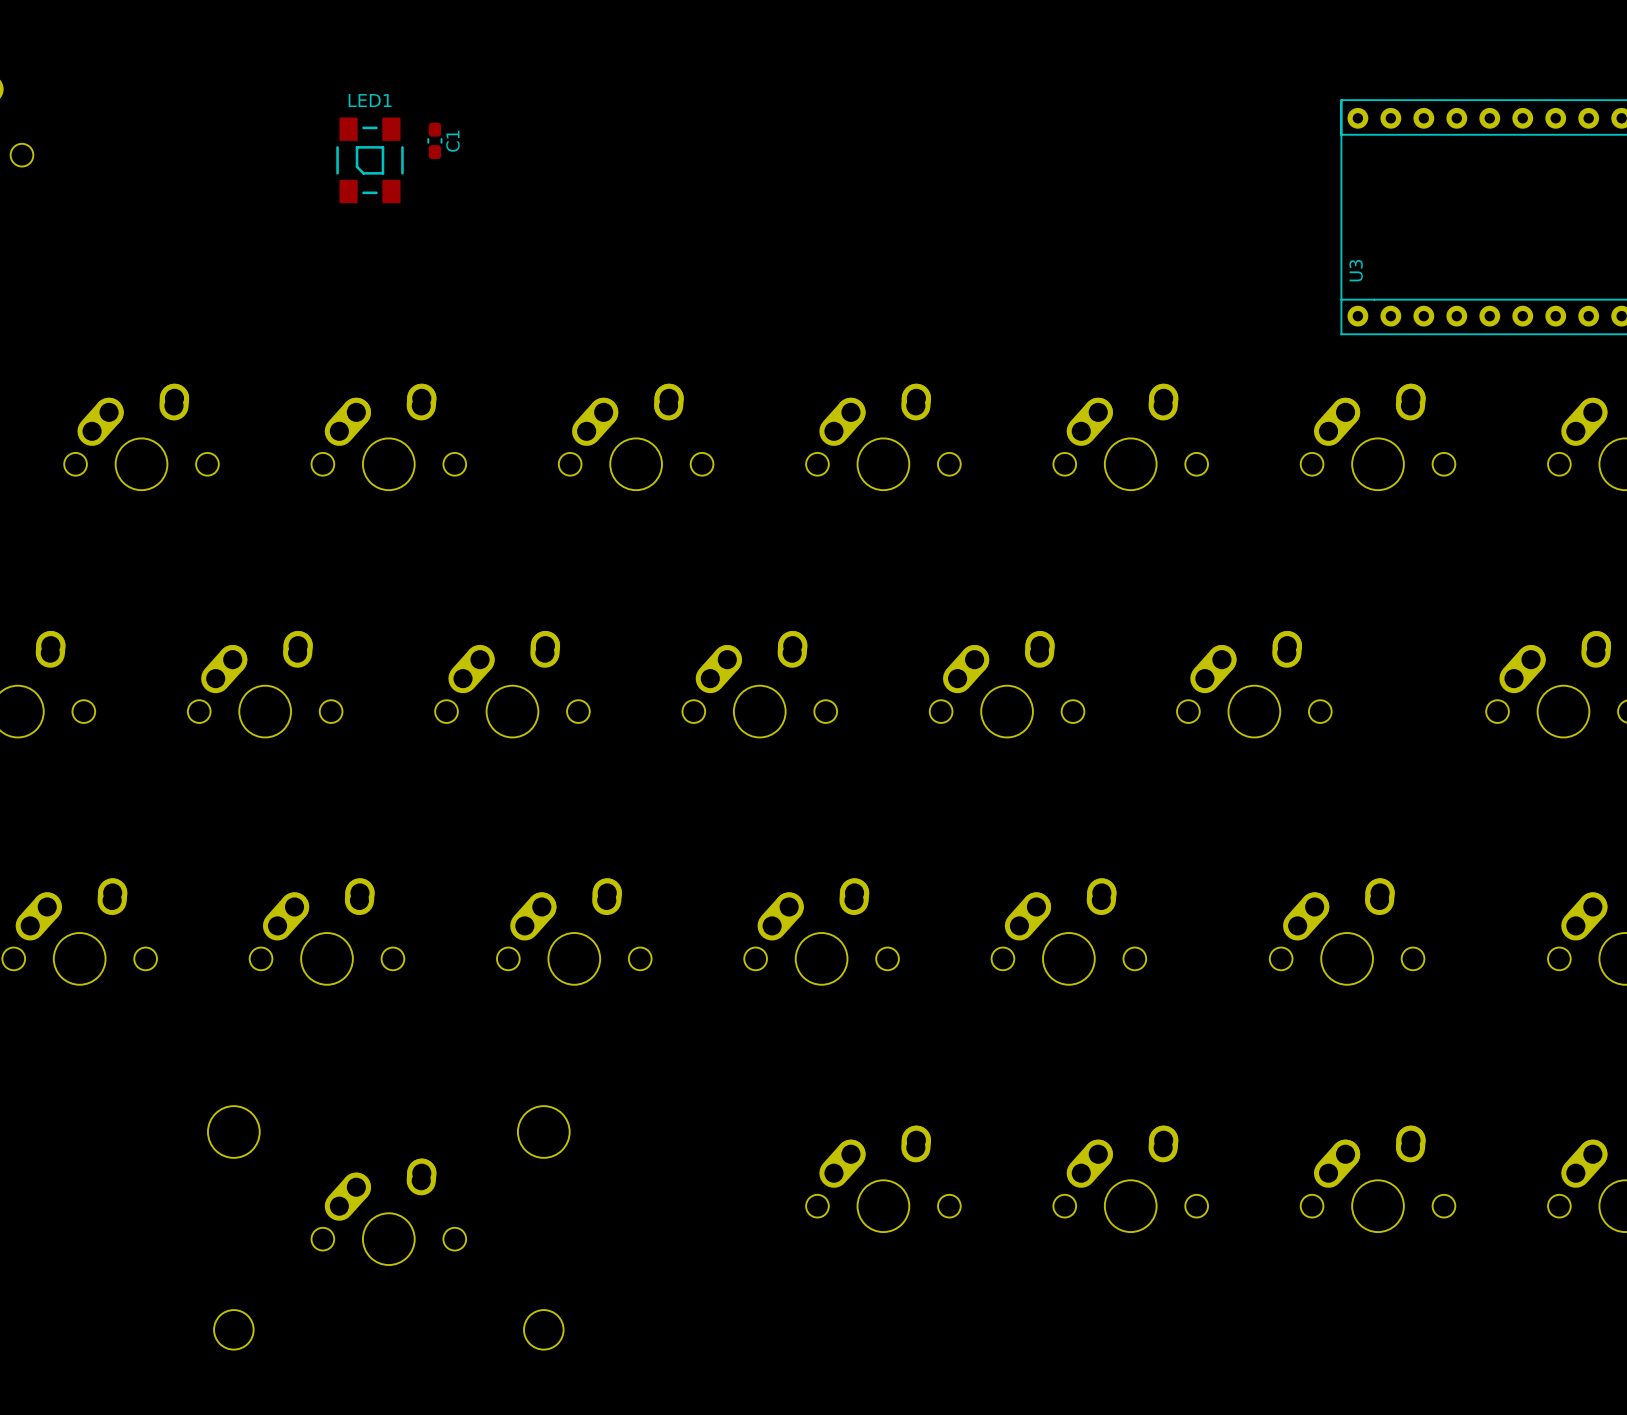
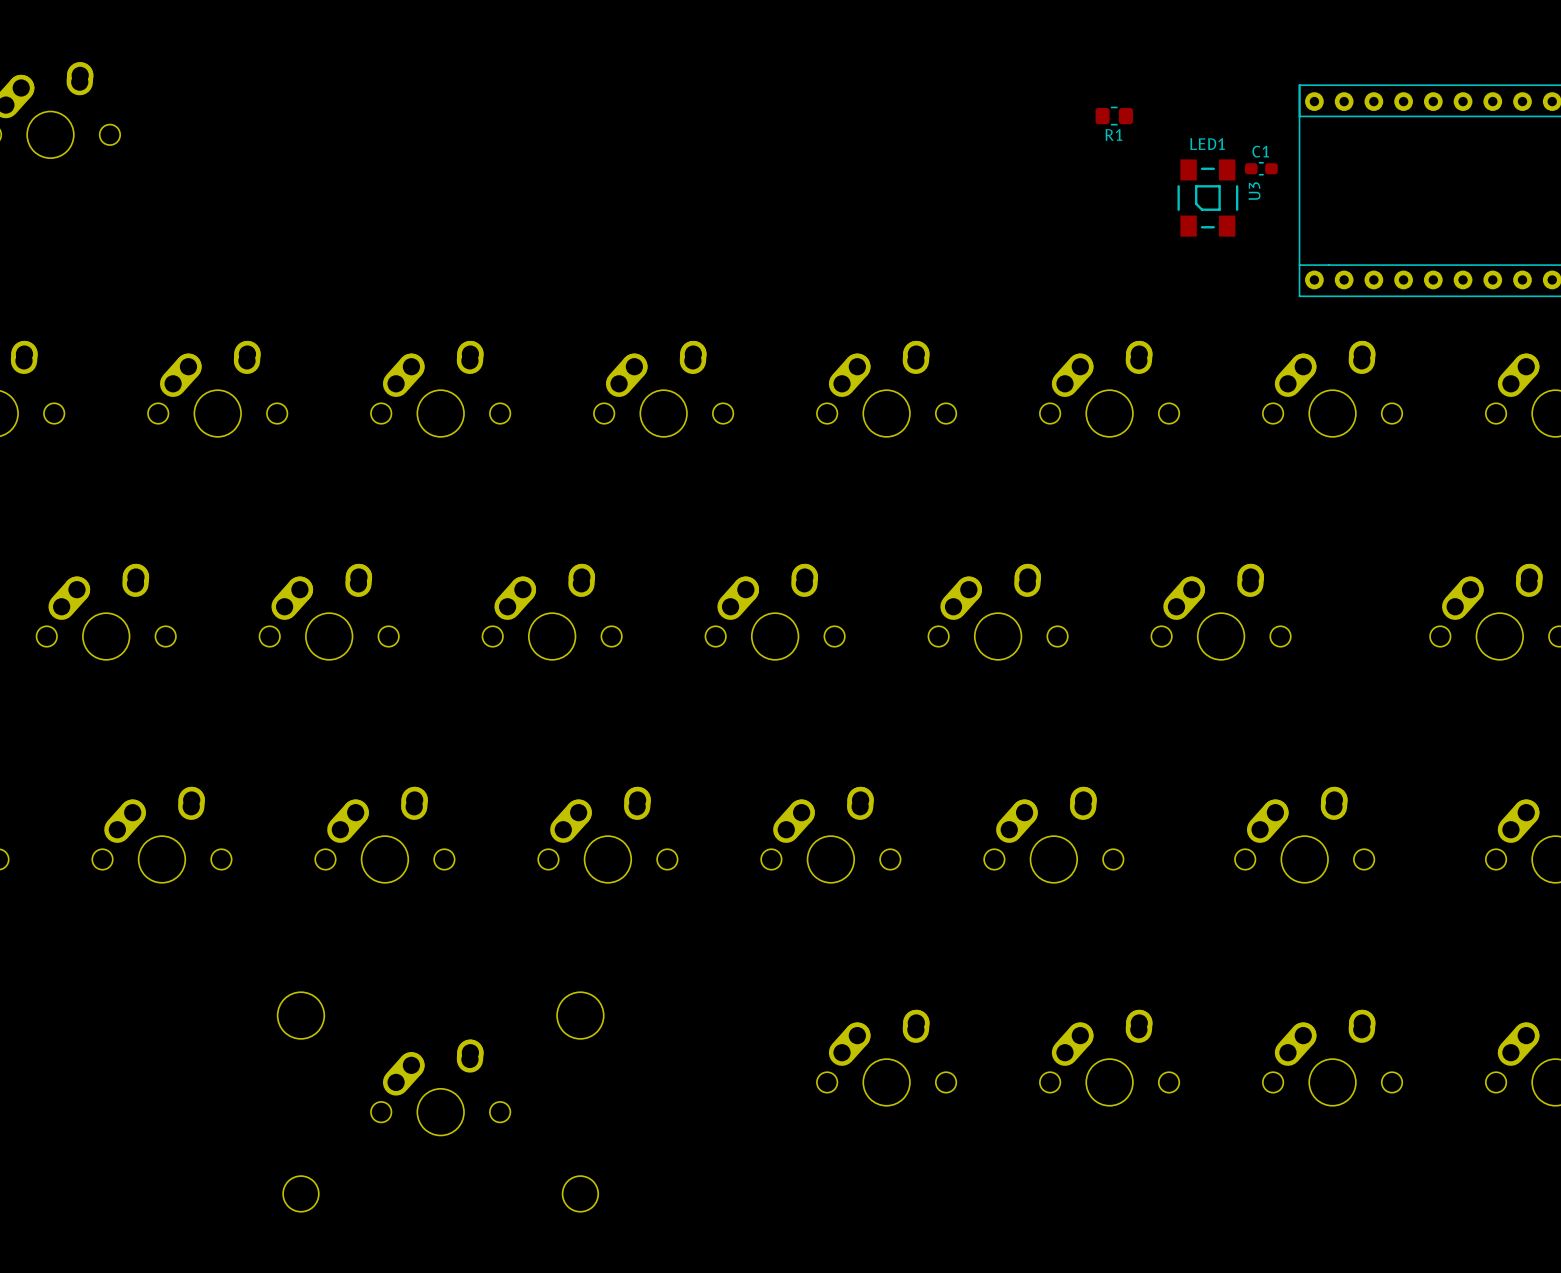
R1: none -> (1114, 116)
C1 rotation: 0° (434, 140) -> 90° clockwise (1261, 168)
C1 position: (434, 140) -> (1261, 168)
C1 name position: C1 (452, 141) -> C1 (1260, 151)
LED1 position: (370, 160) -> (1207, 198)
U3 name position: U3 (1356, 270) -> U3 (1254, 191)

